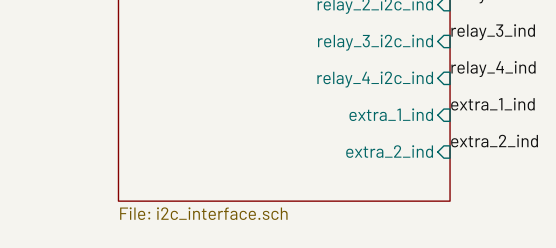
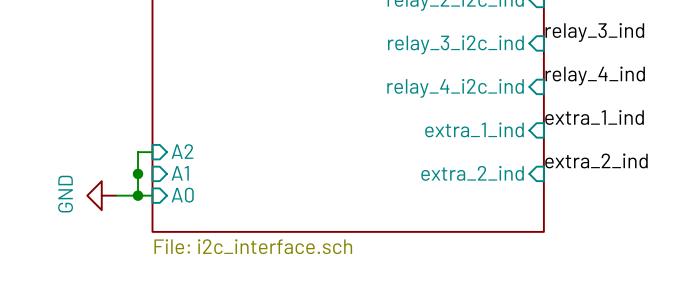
wire: none -> (152, 152) (138, 152) (138, 195)
sheet pin: none -> A2 (182, 151)
sheet pin: none -> A1 (180, 173)
junction: none -> (138, 173)
sheet pin: none -> A0 (182, 195)
power symbol: none -> GND (101, 195)
wire: none -> (116, 195) (152, 195)
junction: none -> (138, 195)

